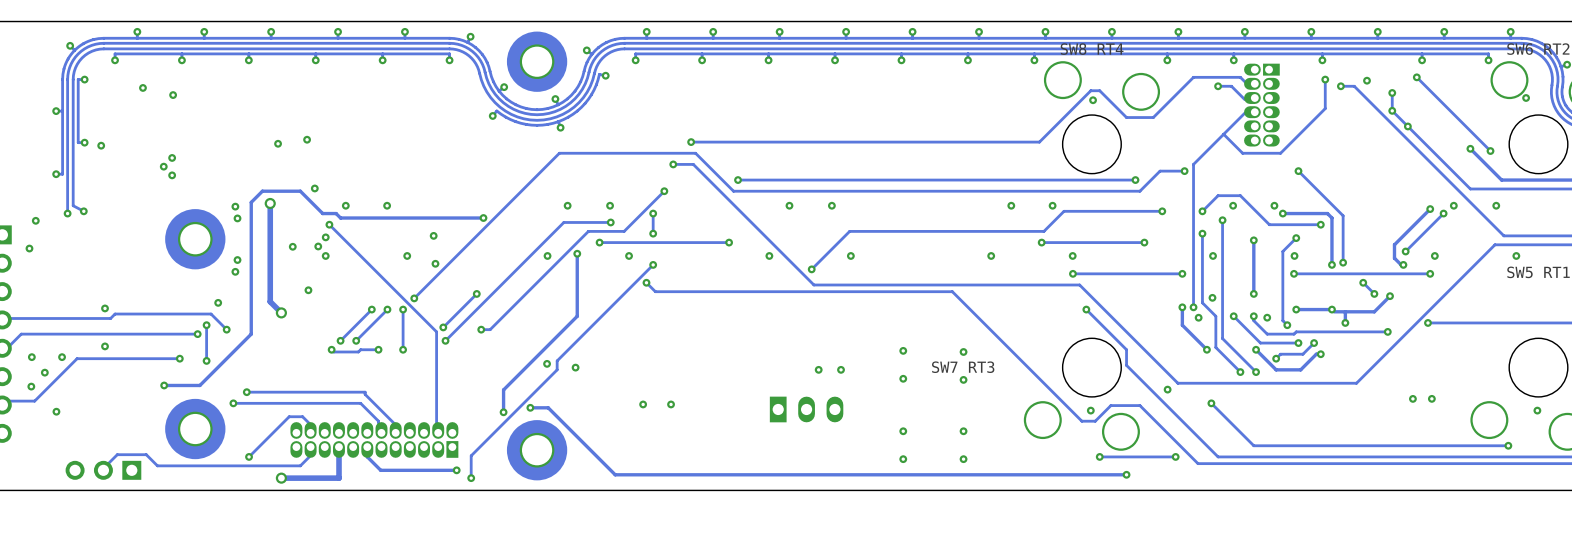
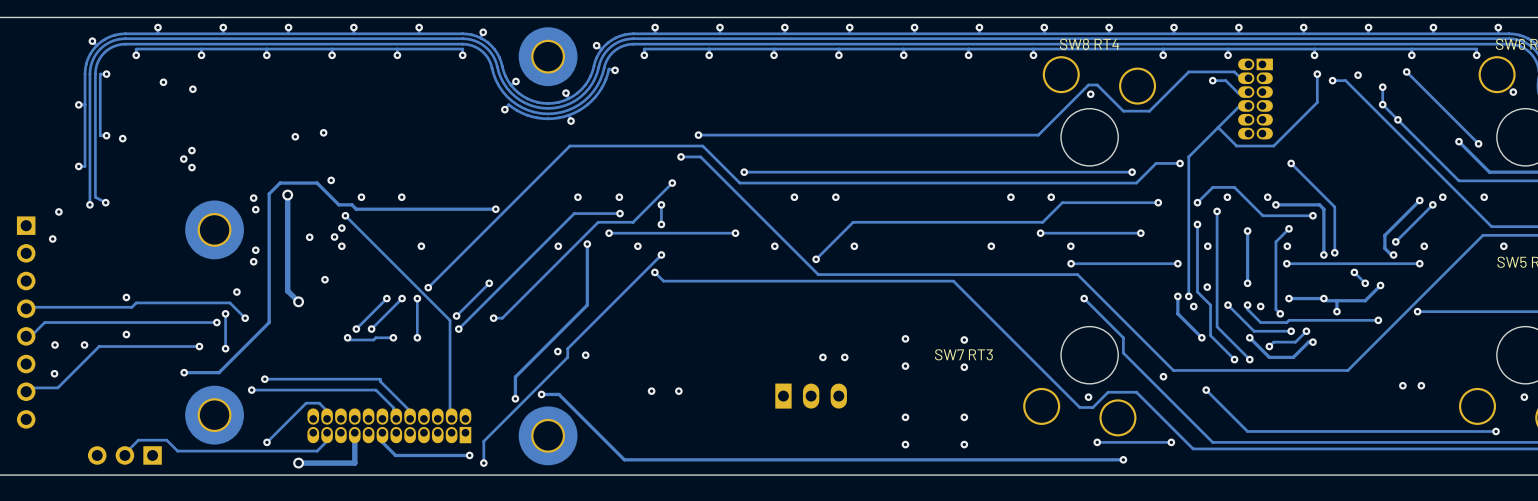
via: (433, 235) -> none
via: (435, 263) -> none
via: (44, 372) -> none
via: (56, 411) -> none

